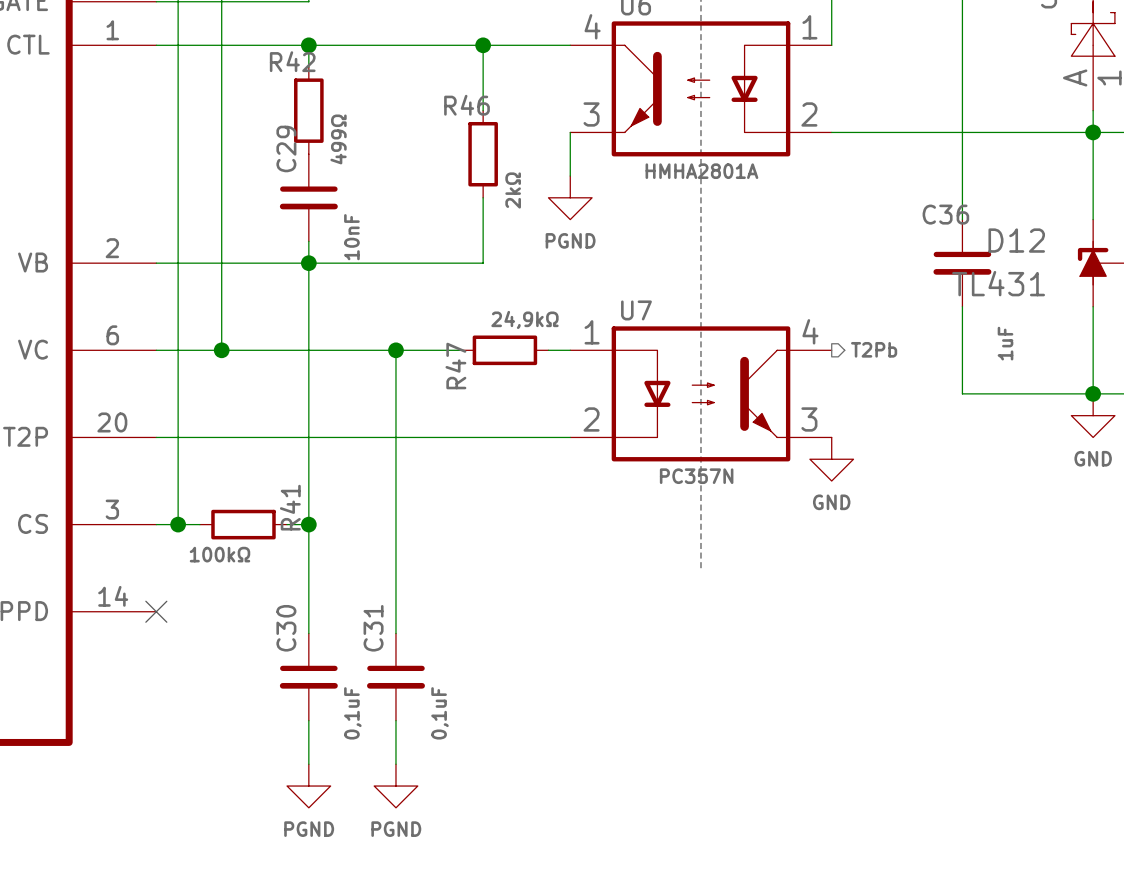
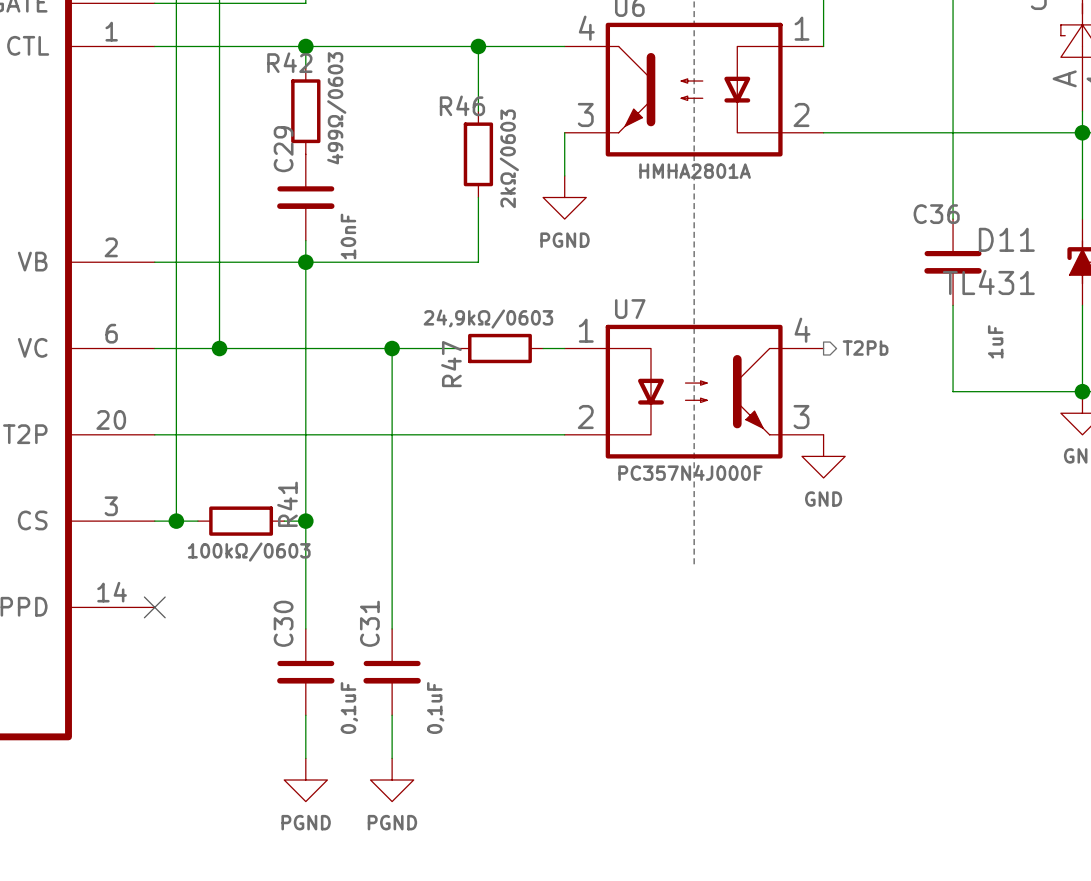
R42 value: 499Ω (338, 139) -> 499Ω/0603 (336, 108)
R46 value: 2kΩ (513, 190) -> 2kΩ/0603 (509, 158)
D12 name: D12 (1016, 240) -> D11 (1006, 239)
R47 value: 24,9kΩ (524, 319) -> 24,9kΩ/0603 (488, 319)
U7 value: PC357N (696, 476) -> PC357N4J000F (690, 472)
R41 value: 100kΩ (219, 554) -> 100kΩ/0603 (249, 552)

